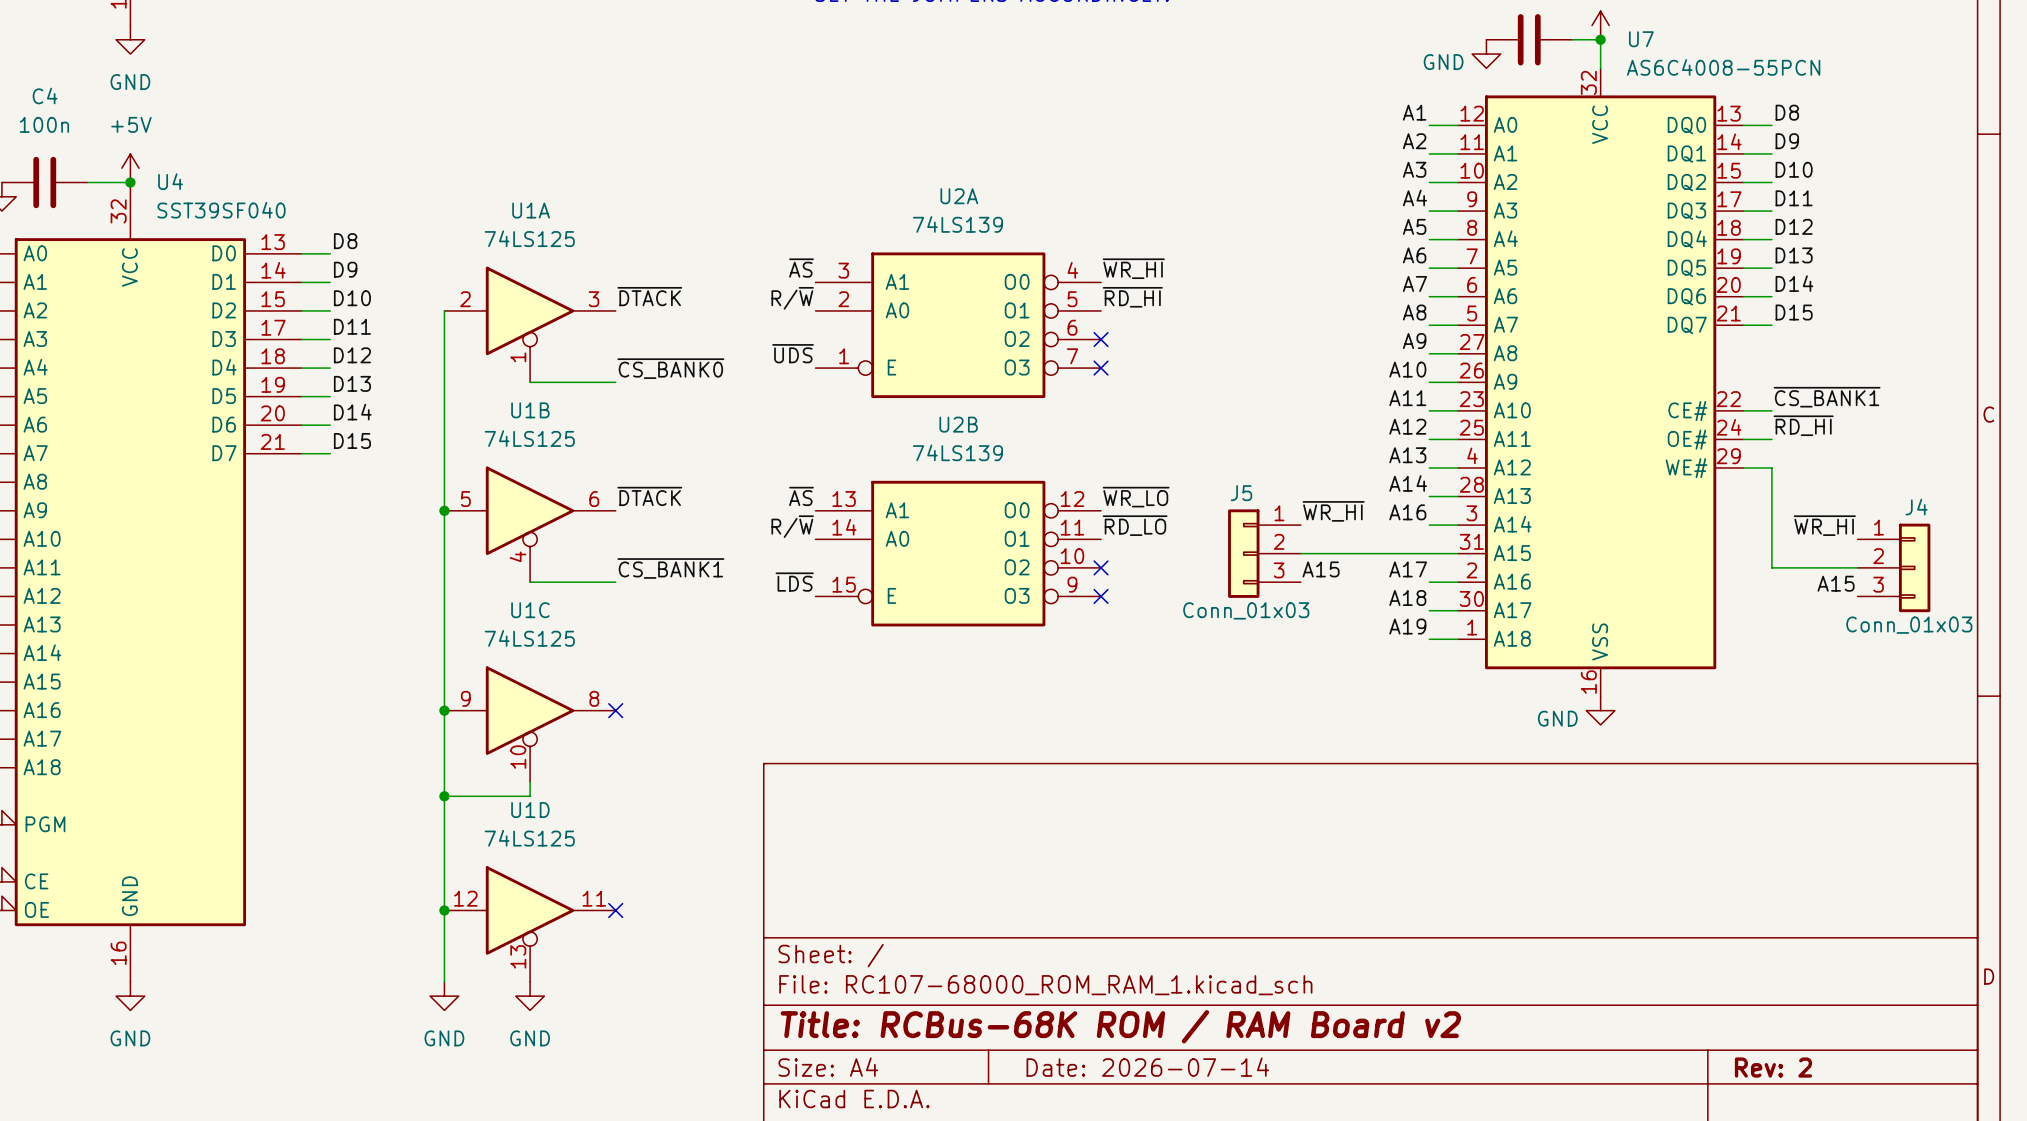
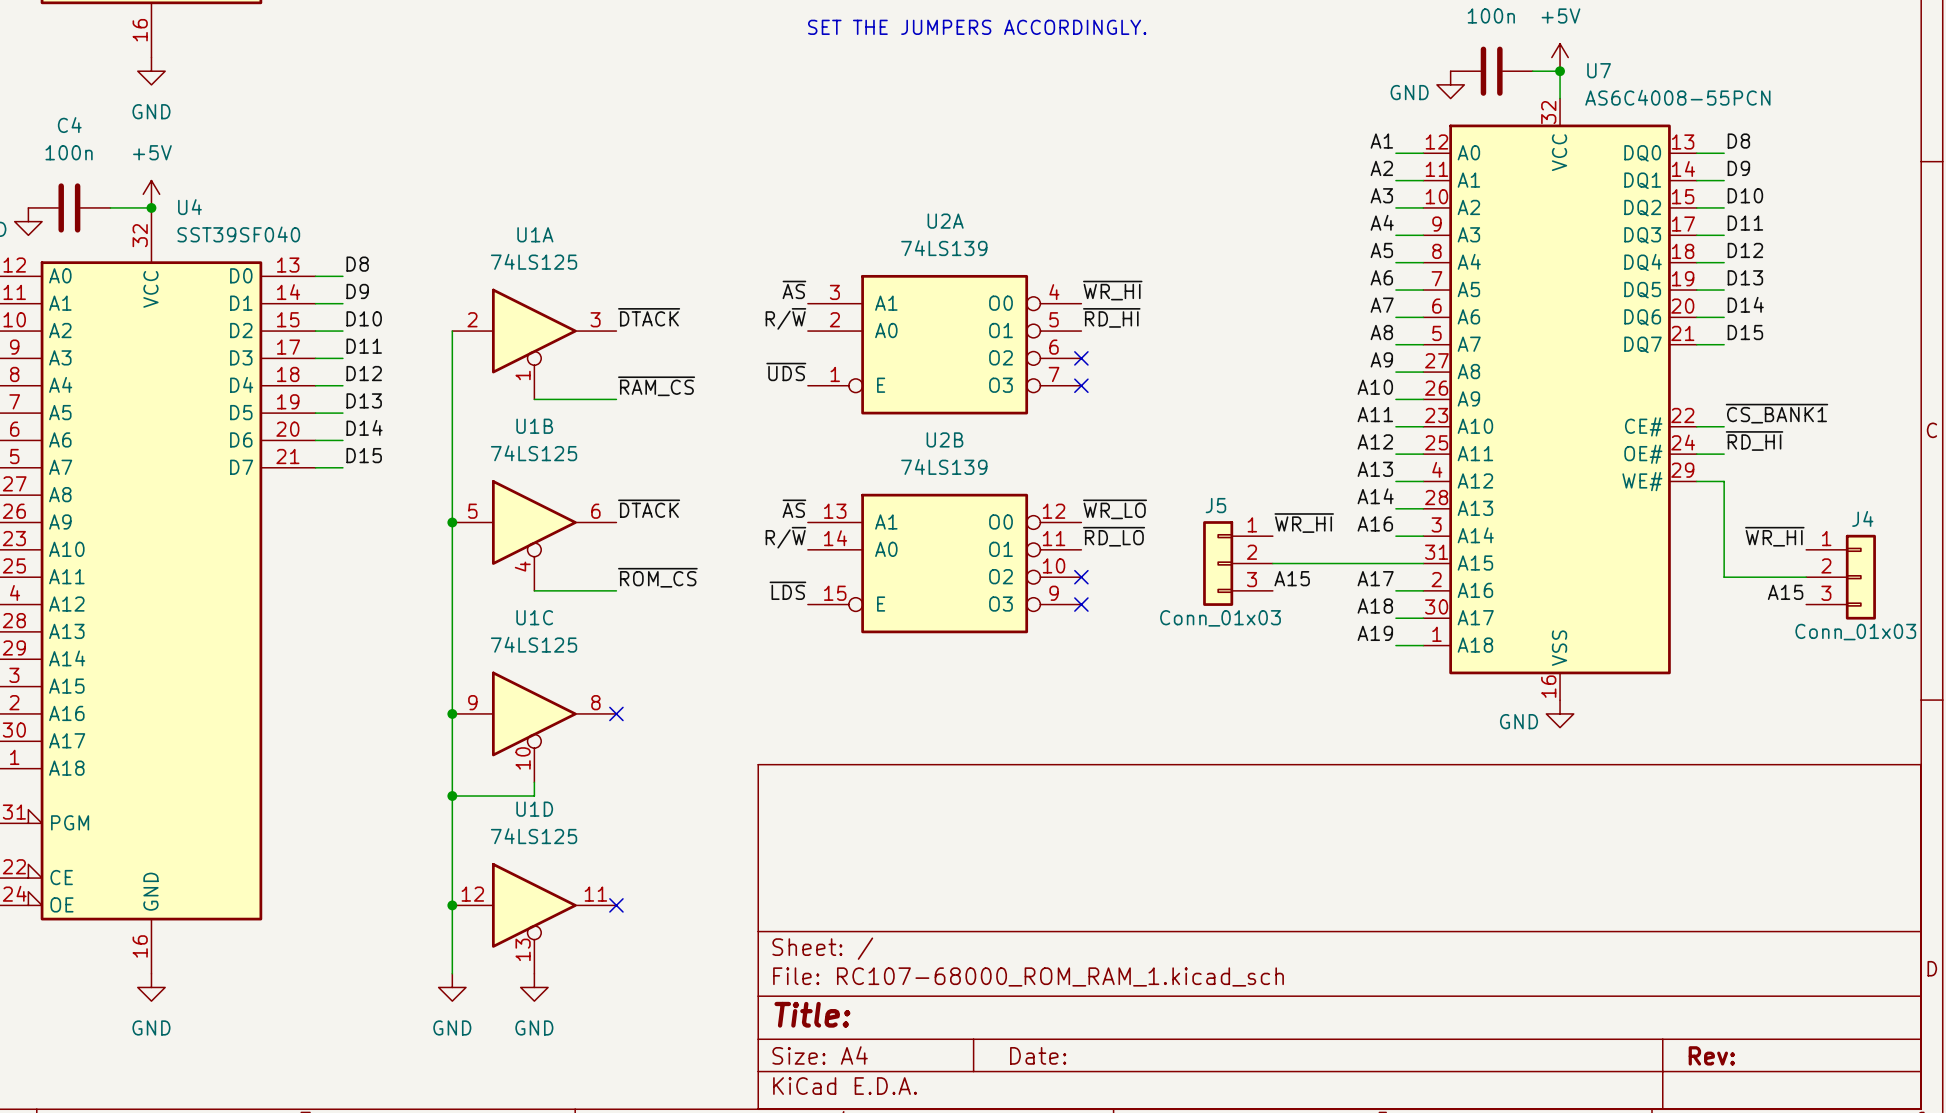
label: ~{CS_BANK0} (670, 368) -> ~{RAM_CS} (656, 386)
label: ~{CS_BANK1} (670, 568) -> ~{ROM_CS} (657, 577)
title block: Title: RCBus-68K ROM / RAM Board v2 (1120, 1026) -> Title: (812, 1014)
title block: Date: 2026-07-14 (1147, 1067) -> Date: (1038, 1055)
title block: Rev: 2 (1773, 1067) -> Rev: (1711, 1055)

